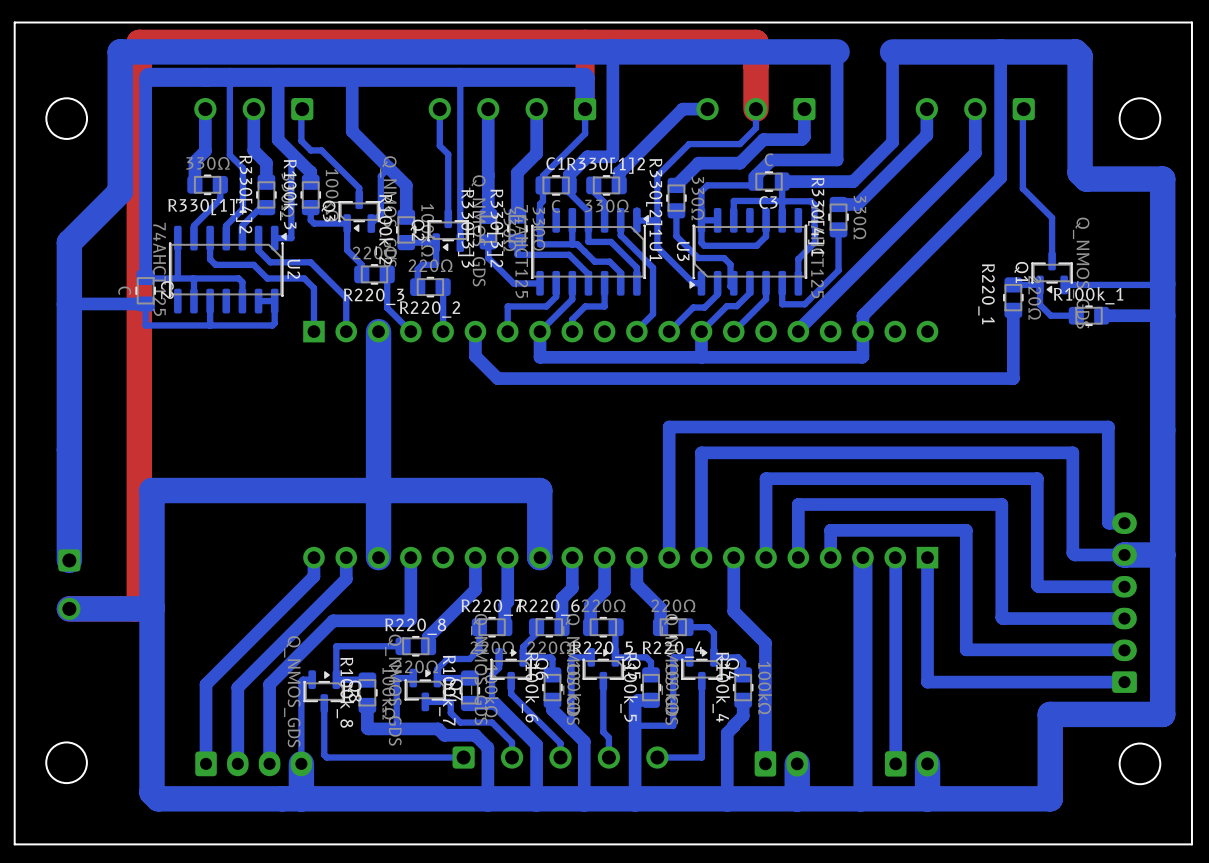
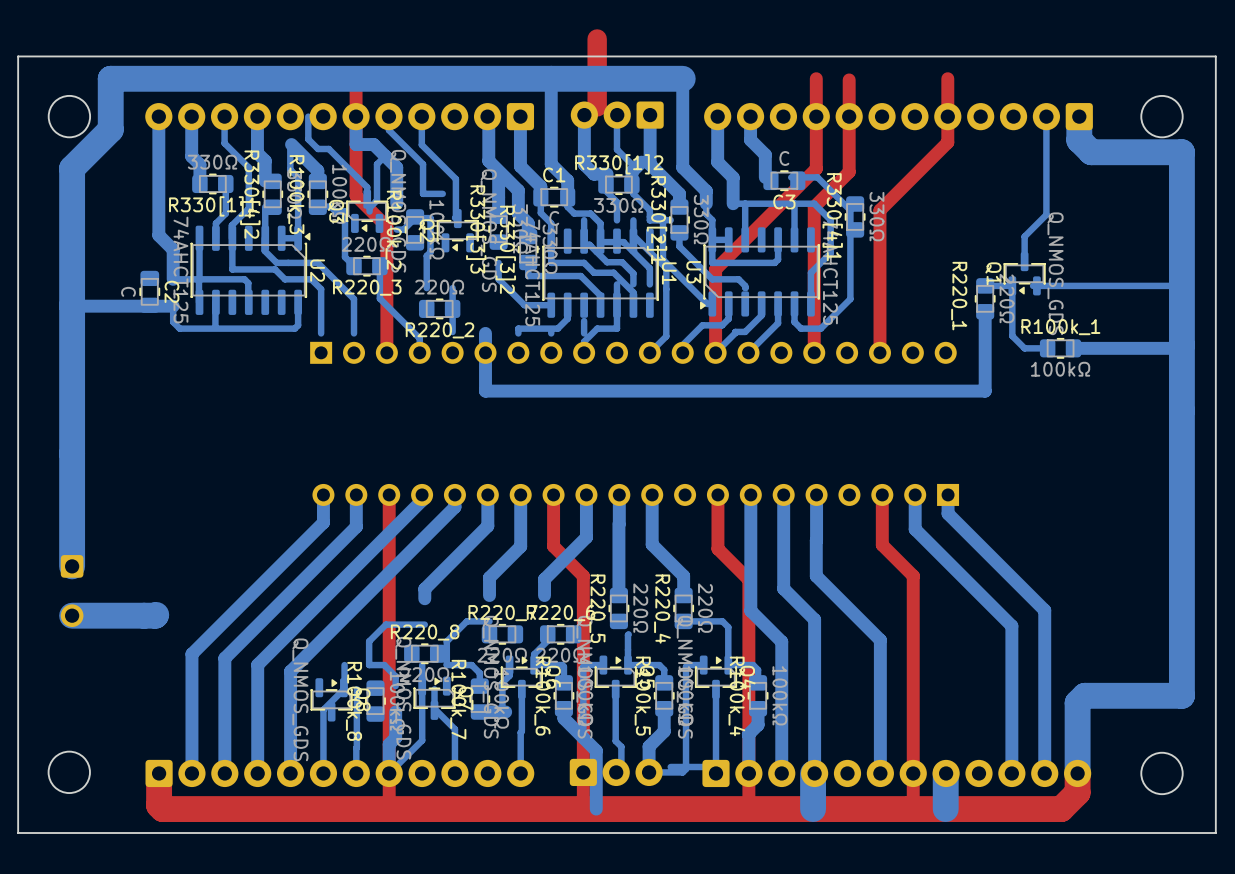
board edge: (1191, 22) (14, 22) (14, 844) (1191, 844) (1191, 22) -> (1215, 56) (1215, 833) (18, 833) (18, 56) (1215, 56)
bottom track: (612, 51) (612, 156) (587, 156) (569, 174) (569, 192) (588, 211) (588, 223) -> (551, 78) (551, 164) (567, 180) (567, 207) (574, 213) (590, 213) (600, 223)
bottom track: (1000, 51) (1000, 177) (862, 315) (862, 357) (540, 357) (540, 331) (572, 299) (572, 283) -> none
top track: (755, 64) (755, 42) (139, 42) (139, 604) (135, 608) (69, 608) -> none
top track: (755, 64) (755, 109) -> none
bottom track: (229, 77) (229, 155) (242, 168) -> (224, 116) (224, 143) (248, 167)
bottom track: (278, 77) (278, 139) (310, 171) -> none
bottom track: (460, 77) (460, 242) -> none
bottom track: (352, 80) (352, 131) (388, 168) -> none
top track: none -> (354, 78) (356, 80) (356, 195) (386, 226) (386, 352)
top track: none -> (816, 78) (816, 168) (715, 269) (715, 352)
top track: none -> (947, 78) (947, 142) (879, 210) (879, 352)
top track: none -> (849, 79) (849, 172) (814, 207) (814, 352)
bottom track: (205, 109) (205, 151) (194, 161) (194, 165) -> (191, 116) (191, 156) (199, 164)
bottom track: (253, 109) (253, 150) (266, 163) (266, 182) -> none
part: (253, 109) -> none
bottom track: (439, 109) (439, 145) (448, 154) (448, 218) -> none
bottom track: (488, 109) (488, 175) -> none
part: (512, 109) -> none
bottom track: (536, 109) (536, 153) (517, 172) (517, 216) -> none
bottom track: (585, 109) (585, 133) (542, 175) (542, 201) (540, 204) (540, 223) -> (520, 116) (520, 166) (540, 186) (540, 213) (551, 223)
bottom track: (585, 109) (584, 77) (148, 77) (145, 80) (145, 277) (168, 278) -> (158, 116) (158, 235) (173, 249) (173, 279)
bottom track: (707, 109) (682, 109) (628, 163) -> none
bottom track: (755, 109) (755, 128) (740, 144) (689, 144) (657, 175) (657, 247) (693, 283) (701, 283) -> none
part: (755, 109) -> none
bottom track: (804, 109) (804, 136) (801, 139) (763, 139) (740, 163) (698, 163) (676, 185) -> none
bottom track: (926, 109) (926, 135) (857, 204) (838, 204) -> none
bottom track: (975, 109) (975, 153) (798, 331) -> none
part: (975, 109) -> none
bottom track: none -> (584, 115) (584, 164) (593, 174) (607, 174)
bottom track: none -> (617, 115) (616, 149) (633, 165) (633, 193) (649, 210)
part: none -> (617, 115)
bottom track: none -> (257, 116) (257, 153) (265, 160) (265, 181)
part: none -> (339, 116)
bottom track: none -> (356, 116) (356, 144) (373, 144) (396, 167) (396, 203)
bottom track: none -> (388, 116) (388, 130) (423, 164) (423, 193) (442, 193)
bottom track: none -> (421, 116) (421, 144) (455, 179) (455, 218)
bottom track: none -> (487, 116) (488, 160) (518, 190) (518, 213) (528, 223) (528, 236)
bottom track: none -> (750, 116) (750, 140) (765, 154) (765, 177)
part: none -> (898, 116)
bottom track: (1022, 118) (1022, 188) (1052, 217) (1052, 261) -> none
bottom track: none -> (1046, 116) (1046, 214) (1024, 236) (1024, 261)
bottom track: none -> (1079, 116) (1079, 140) (1091, 152) (1181, 152) (1181, 695) (1084, 695) (1077, 703) (1077, 773)
bottom track: none -> (646, 118) (650, 115) (649, 164) (679, 193) (679, 207)
bottom track: none -> (385, 156) (377, 164) (377, 200) (369, 207) (369, 211)
bottom track: (291, 160) (291, 178) -> (317, 170) (290, 144) (290, 169) (298, 177)
bottom track: (388, 168) (380, 176) (380, 214) (371, 223) -> none
bottom track: (388, 168) (406, 185) (406, 217) -> none
bottom track: none -> (791, 177) (817, 177) (850, 210) (850, 299) (820, 328) (801, 328) (794, 322) (794, 303)
bottom track: (755, 181) (755, 175) (771, 159) (837, 159) (837, 51) (120, 51) (120, 191) (69, 242) -> (778, 239) (778, 259) (774, 262) (712, 262) (712, 220) (706, 214) (706, 191) (682, 167) (682, 78) (110, 78) (110, 129) (72, 168) (72, 242)
C1 position: (556, 185) -> (554, 197)
bottom track: (752, 185) (707, 185) (701, 191) (701, 242) (704, 245) (756, 245) (766, 236) (766, 220) -> none
R330[2]1 position: (676, 198) -> (679, 219)
bottom track: (220, 199) (193, 225) (193, 238) -> (225, 198) (225, 213) (215, 223) (215, 238)
bottom track: none -> (745, 203) (745, 239)
bottom track: none -> (794, 203) (794, 239)
bottom track: none -> (265, 207) (265, 238)
bottom track: (266, 207) (260, 207) (242, 225) (242, 238) -> none
bottom track: (310, 207) (310, 220) (314, 223) (347, 223) (347, 250) (361, 264) (361, 274) -> none
bottom track: none -> (317, 206) (330, 206) (335, 211) (344, 211) (344, 257) (354, 266)
bottom track: (676, 210) (676, 236) (698, 258) (724, 258) (730, 264) (730, 284) -> (679, 232) (679, 246) (712, 279) (738, 279) (745, 285)
bottom track: none -> (649, 216) (663, 216) (663, 259) (707, 303) (712, 303)
bottom track: (717, 220) (701, 220) -> (728, 239) (712, 239)
bottom track: (782, 220) (782, 181) (853, 181) (892, 142) (892, 51) (1075, 51) (1080, 56) (1080, 172) (1086, 179) (1162, 179) (1162, 714) (1050, 714) (1050, 798) (158, 798) (152, 792) (152, 490) (539, 490) (540, 557) -> none
bottom track: (814, 220) (814, 204) (811, 201) (782, 200) (733, 200) (733, 220) -> (830, 220) (814, 203) (733, 203) (733, 177) (717, 162) (717, 116)
bottom track: (814, 226) (814, 242) (798, 259) (798, 283) -> (830, 226) (830, 253) (810, 272) (810, 303)
R330[3]2 position: (517, 228) -> (528, 249)
bottom track: (838, 229) (838, 270) (804, 304) (782, 304) (782, 283) -> none
bottom track: (177, 238) (177, 278) -> none
bottom track: none -> (199, 238) (199, 279)
bottom track: (210, 238) (210, 259) (215, 264) (253, 264) (267, 278) (278, 278) -> (232, 238) (232, 269) (275, 269) (284, 279)
bottom track: (488, 241) (488, 258) (513, 283) (540, 283) -> (498, 262) (498, 279) (524, 305) (551, 305)
bottom track: (517, 241) (517, 254) (569, 254) (588, 274) (588, 283) -> (528, 262) (528, 276) (580, 276) (600, 295) (600, 305)
bottom track: (406, 242) (436, 242) (436, 263) (422, 264) (417, 269) -> (396, 229) (403, 229) (415, 218) (430, 218) (430, 252) (426, 255) (426, 270)
bottom track: (572, 244) (540, 244) -> (633, 305) (633, 292) (613, 272) (593, 272) (584, 262) (551, 262) (551, 244)
U1 position: (590, 251) -> (602, 273)
U3 position: (748, 251) -> (759, 271)
bottom track: none -> (379, 266) (379, 298) (419, 338) (419, 352)
U2 position: (227, 269) -> (250, 270)
Q1 position: (1052, 273) -> (1024, 273)
R220_3 position: (374, 274) -> (366, 266)
bottom track: (387, 274) (387, 307) (410, 331) -> none
bottom track: (556, 283) (556, 296) (546, 306) (507, 306) (507, 326) -> (567, 305) (567, 318) (557, 328) (518, 328)
bottom track: (717, 283) (717, 294) (704, 307) (693, 307) (669, 331) -> none
bottom track: (749, 283) (749, 293) (736, 306) (726, 306) (701, 331) (701, 357) -> none
bottom track: (766, 283) (766, 299) (733, 331) -> none
bottom track: none -> (985, 285) (1012, 285) (1012, 336) (1024, 348) (1047, 348)
bottom track: (1040, 284) (1040, 304) (1050, 315) (1076, 315) -> (1060, 285) (1084, 285)
R220_2 position: (430, 287) -> (439, 308)
R220_1 position: (1013, 297) -> (985, 298)
bottom track: (258, 301) (274, 301) (274, 323) (272, 325) (145, 325) (145, 303) (69, 304) -> (173, 306) (72, 305)
bottom track: none -> (298, 302) (298, 325) (294, 328) (179, 328) (173, 322) (173, 309)
bottom track: none -> (728, 303) (728, 318) (722, 325) (702, 325) (682, 345) (682, 352)
bottom track: none -> (761, 303) (761, 315) (745, 331) (735, 331) (715, 352)
bottom track: none -> (778, 303) (778, 323) (748, 352)
bottom track: (604, 306) (585, 306) (572, 319) -> (616, 307) (616, 328) (597, 328) (584, 341) (584, 352)
bottom track: (1013, 310) (1013, 378) (497, 378) (475, 356) -> (985, 311) (985, 391) (485, 391) (485, 358)
bottom track: (653, 314) (636, 330) -> (666, 315) (666, 336) (649, 352)
R100k_1 position: (1089, 315) -> (1060, 348)
bottom track: (1162, 315) (1101, 315) -> none
bottom track: (378, 331) (378, 489) -> none
part position: (620, 331) -> (633, 352)
bottom track: none -> (1181, 345) (1178, 348) (1073, 348)
R100k_1 value: none -> 100kΩ (1060, 369)
bottom track: none -> (323, 494) (323, 522) (191, 654) (191, 773)
bottom track: none -> (356, 494) (356, 526) (224, 658) (224, 773)
top track: none -> (389, 494) (389, 806)
bottom track: none -> (422, 494) (422, 500) (257, 664) (257, 773)
bottom track: none -> (454, 494) (454, 507) (290, 671) (290, 773)
bottom track: none -> (487, 494) (487, 526) (424, 589) (424, 598)
bottom track: none -> (520, 494) (520, 546) (489, 577) (489, 595)
top track: none -> (553, 494) (553, 546) (583, 576) (583, 806)
bottom track: none -> (586, 494) (586, 537) (544, 579) (544, 595)
bottom track: none -> (619, 494) (618, 595)
bottom track: none -> (652, 494) (652, 544) (683, 576) (683, 595)
top track: none -> (717, 494) (717, 548) (748, 579) (748, 808)
bottom track: none -> (750, 494) (750, 610) (781, 641) (781, 773)
bottom track: none -> (783, 494) (783, 588) (814, 619) (814, 773)
bottom track: none -> (816, 494) (816, 576) (880, 640) (880, 773)
top track: none -> (882, 494) (882, 545) (913, 576)
bottom track: none -> (915, 494) (915, 529) (1011, 626) (1011, 773)
bottom track: none -> (948, 494) (948, 513) (1044, 610) (1044, 773)
bottom track: (378, 491) (378, 557) -> none
bottom track: (1124, 523) (1108, 522) (1108, 427) (669, 427) (669, 557) -> none
bottom track: (1162, 554) (1074, 554) (1072, 552) (1072, 452) (701, 452) (701, 557) -> none
bottom track: (313, 557) (313, 576) (206, 684) (206, 763) -> none
bottom track: (346, 557) (346, 579) (237, 687) (237, 763) -> none
bottom track: (410, 557) (409, 620) (333, 620) (269, 684) (269, 763) -> none
bottom track: (475, 557) (475, 589) (428, 636) (428, 646) -> none
bottom track: (507, 557) (507, 602) (504, 604) (504, 627) -> none
bottom track: (572, 557) (572, 588) (562, 598) (562, 627) -> none
bottom track: (604, 557) (604, 590) (590, 604) (590, 627) -> none
part position: (620, 557) -> (635, 494)
bottom track: (636, 557) (636, 584) (660, 608) (660, 627) -> none
bottom track: (733, 557) (733, 611) (765, 643) (765, 763) -> none
bottom track: (766, 557) (766, 478) (1037, 478) (1037, 585) (1124, 586) -> none
bottom track: (798, 557) (798, 504) (1001, 504) (1002, 618) (1124, 618) -> none
bottom track: (830, 557) (830, 530) (966, 530) (966, 649) (1124, 650) -> none
bottom track: (862, 557) (862, 796) -> none
bottom track: (895, 557) (895, 763) -> none
bottom track: (927, 557) (927, 682) (1124, 682) -> none
top track: none -> (913, 576) (913, 805)
part: (1124, 602) -> none
bottom track: none -> (489, 621) (466, 621) (446, 641) (446, 665) (471, 665) (479, 673) (479, 682)
bottom track: none -> (424, 624) (385, 624) (369, 641) (369, 665) (384, 665) (395, 676) (395, 686)
bottom track: (479, 627) (479, 649) (469, 658) (447, 658) (437, 669) (437, 678) (469, 678) -> none
R220_5 rotation: 0° (603, 627) -> 90° clockwise (618, 608)
R220_5 position: (603, 627) -> (618, 608)
R220_4 rotation: 0° (673, 627) -> 90° clockwise (683, 608)
R220_4 position: (673, 627) -> (683, 608)
bottom track: (685, 627) (708, 627) (713, 632) -> (683, 621) (722, 621) (728, 627) (728, 640)
bottom track: (403, 646) (336, 646) (336, 679) (367, 680) -> none
bottom track: none -> (344, 665) (344, 688) (323, 709) (323, 773)
bottom track: none -> (422, 665) (422, 740) (389, 773) (389, 744) (395, 737) (395, 711)
bottom track: (673, 658) (673, 725) (635, 725) -> (686, 665) (686, 769) (682, 772) (649, 772) (649, 746) (664, 731) (664, 708)
bottom track: (413, 678) (396, 678) (396, 728) -> none
bottom track: (312, 679) (301, 681) (301, 798) -> none
bottom track: none -> (356, 689) (356, 773)
bottom track: none -> (434, 689) (434, 708) (454, 729) (454, 773)
bottom track: (511, 693) (560, 743) (560, 757) -> (521, 702) (520, 773)
bottom track: (651, 700) (638, 700) (635, 703) (635, 798) -> none
bottom track: (425, 701) (449, 701) (450, 713) (460, 722) (492, 722) (512, 742) (512, 757) -> none
bottom track: (324, 703) (324, 754) (326, 757) (463, 757) -> none
bottom track: (495, 703) (536, 744) (536, 798) -> none
bottom track: (367, 705) (368, 728) (438, 728) (444, 735) (475, 735) (487, 747) (487, 798) -> none
bottom track: (734, 726) (727, 733) (727, 798) -> (748, 735) (748, 773)
part: (560, 757) -> none
part: none -> (616, 772)
part: (253, 763) -> none
part: none -> (339, 773)
part: (781, 763) -> none
part: none -> (896, 773)
part: (911, 763) -> none
top track: none -> (1077, 773) (1077, 792) (1061, 809) (162, 809) (159, 805) (159, 773)

